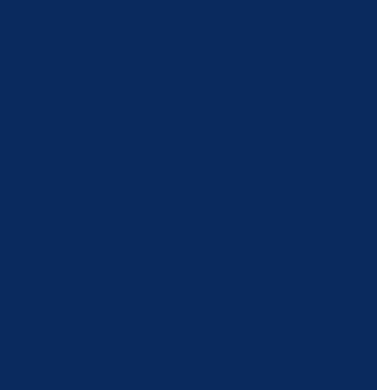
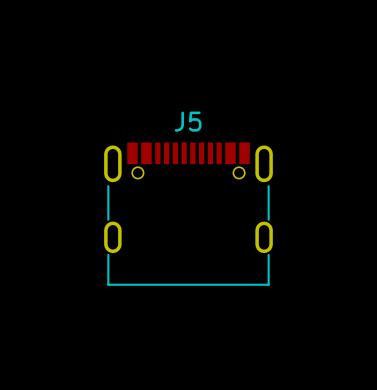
J5: none -> (188, 214)

